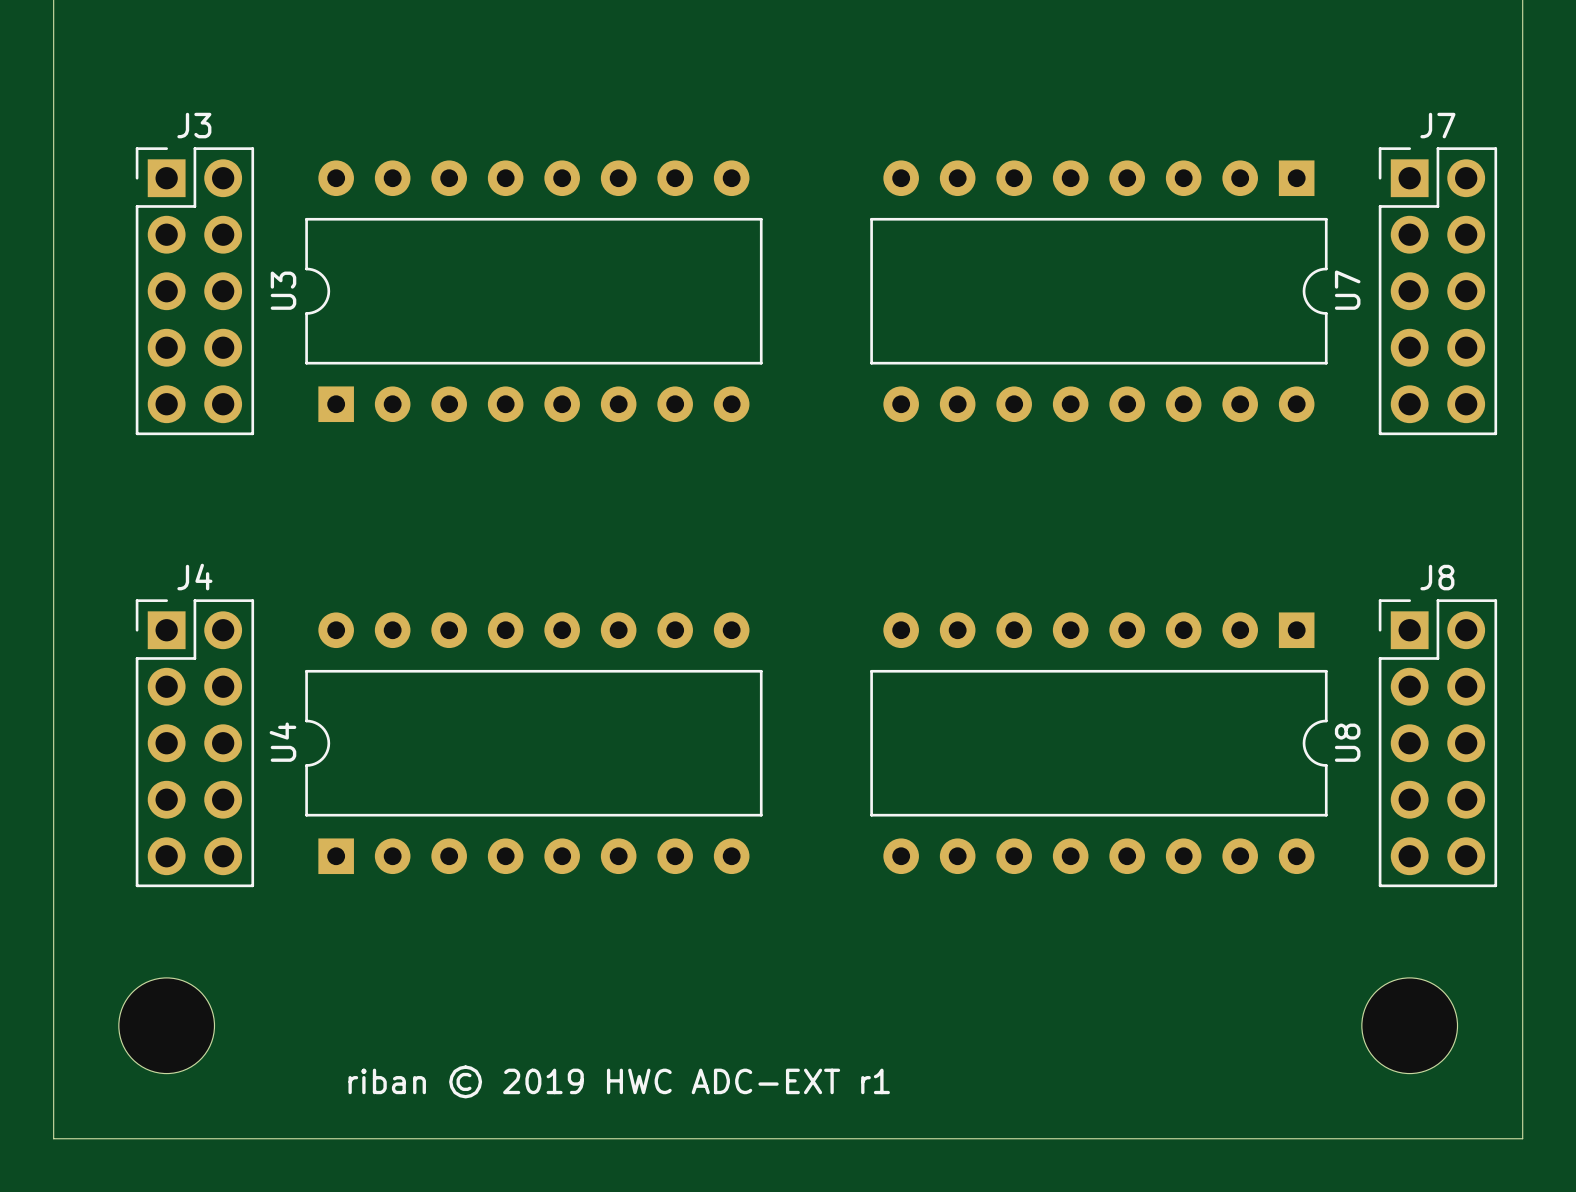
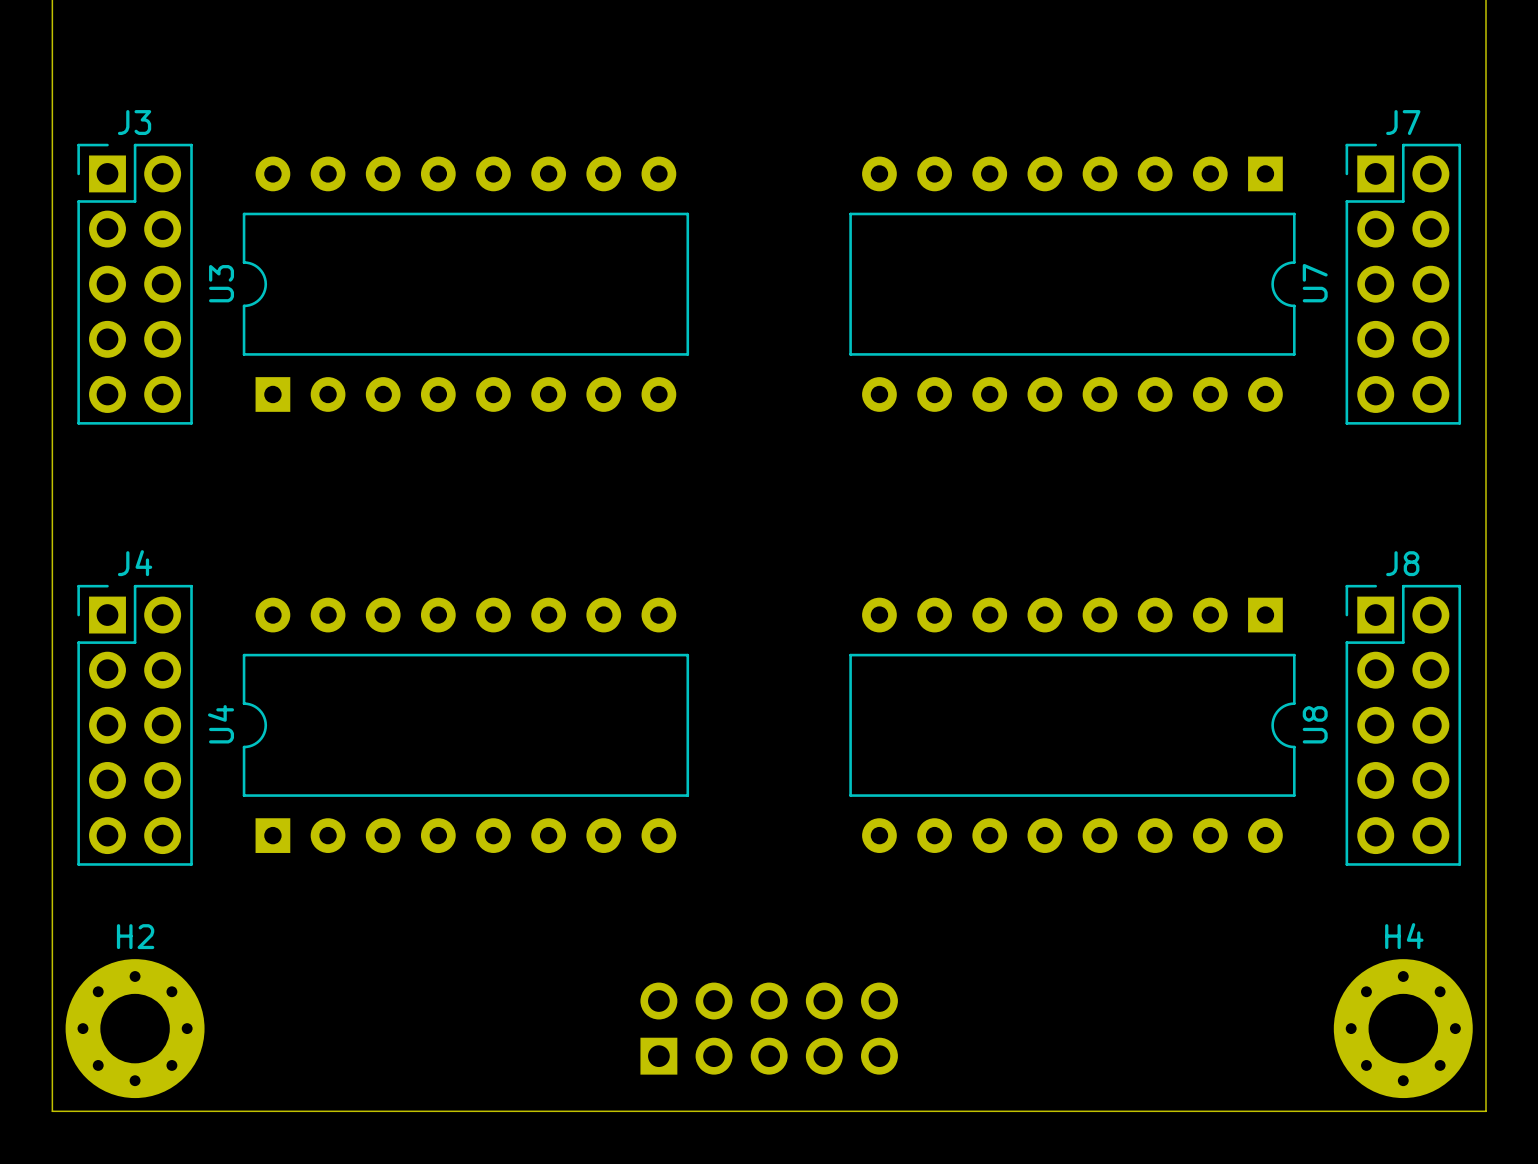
J3 position: (194, 291) -> (135, 284)
U3 position: (533, 291) -> (465, 284)
J4 position: (194, 743) -> (135, 725)
U4 position: (533, 743) -> (465, 725)
part: (166, 1025) -> none
part: (1409, 1025) -> none
H2: none -> (135, 1028)
part: none -> (769, 1028)
H4: none -> (1403, 1028)
text: riban © 2019 HWC ADC-EXT r1 (619, 1081) -> none

